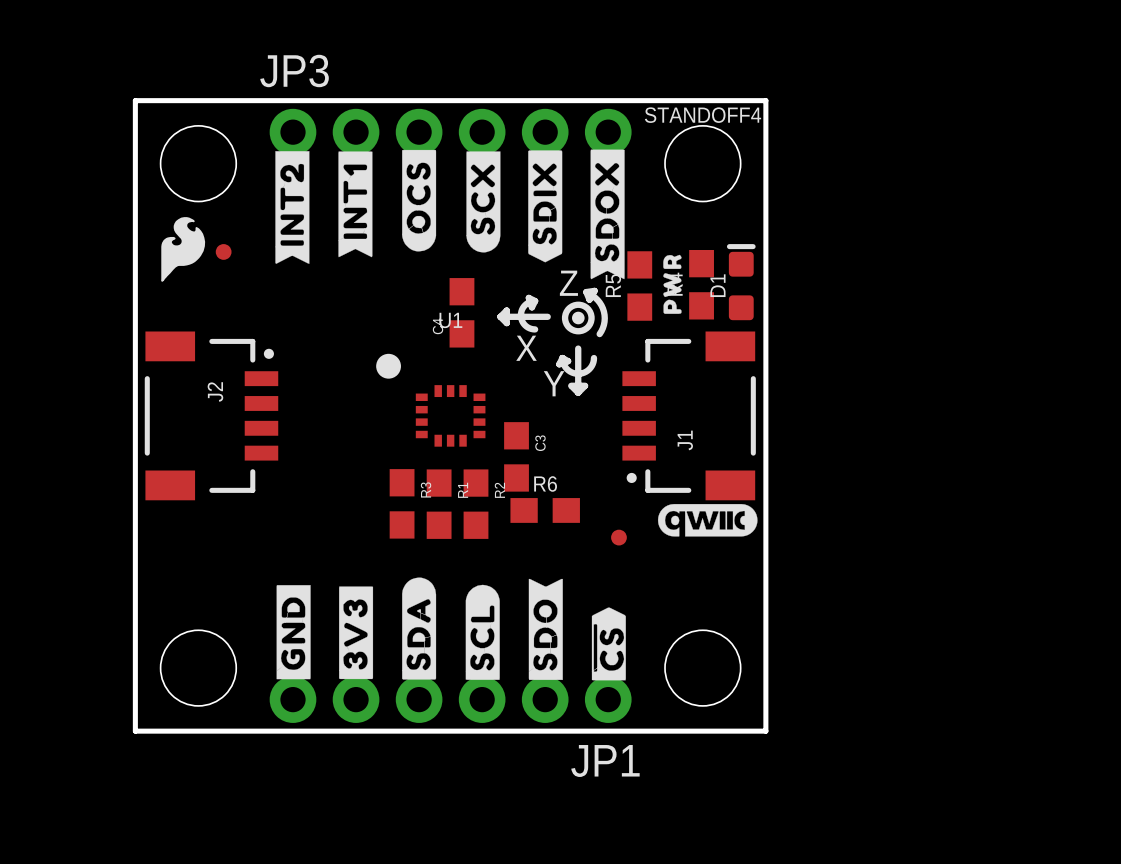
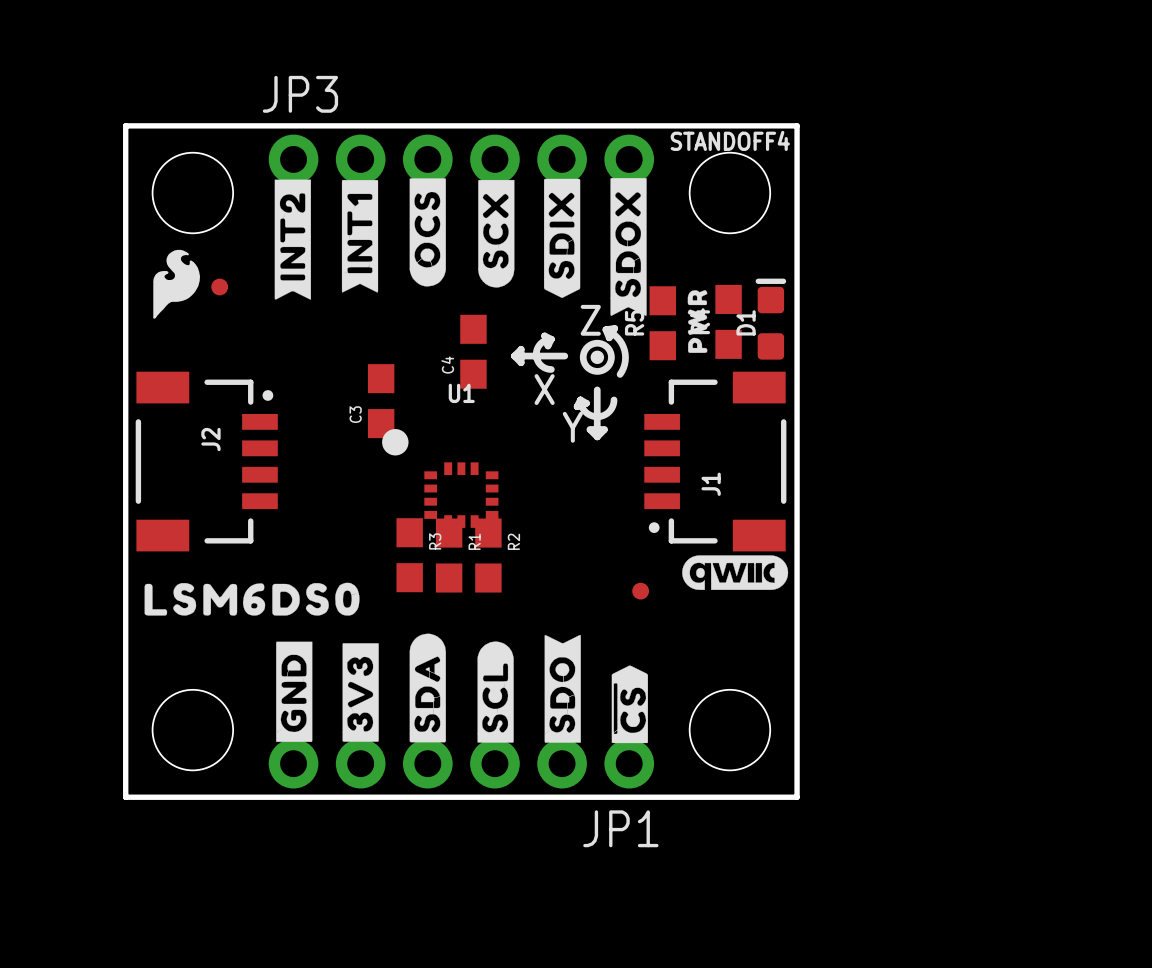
U1 position: (430, 400) -> (440, 478)
C3 name position: C3 (540, 443) -> C3 (355, 414)
C3 position: (516, 456) -> (381, 401)
R6: (545, 510) -> none
drawing: none -> [144, 582, 360, 616]

